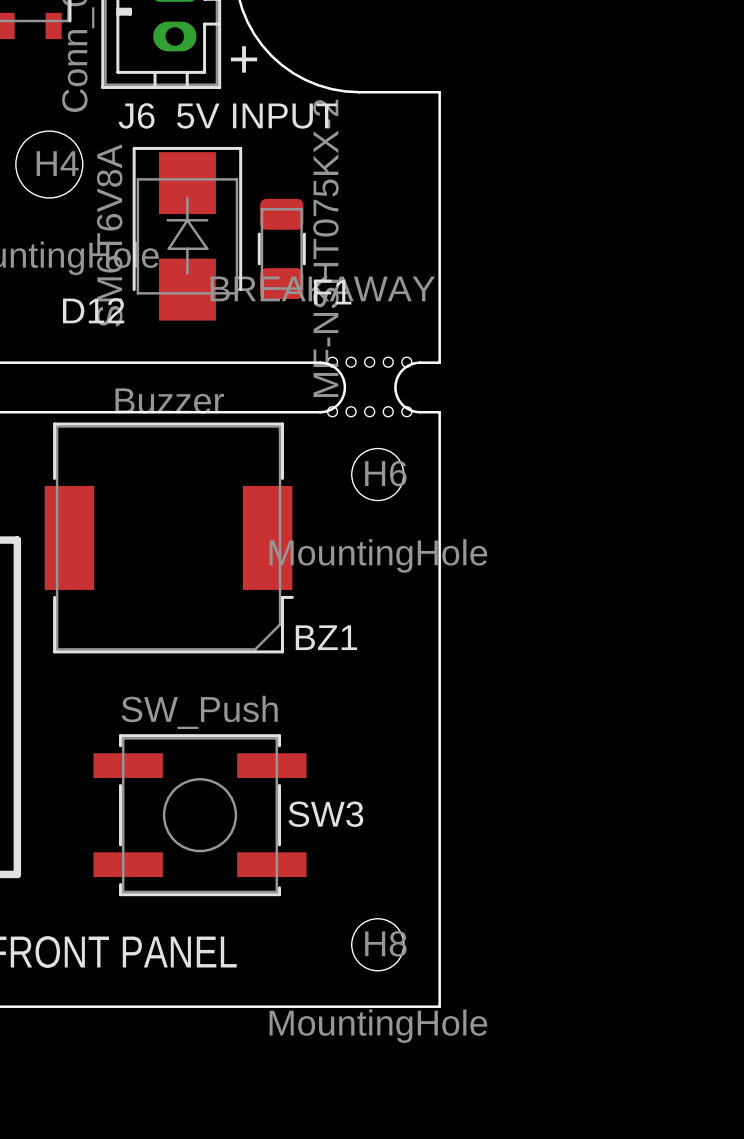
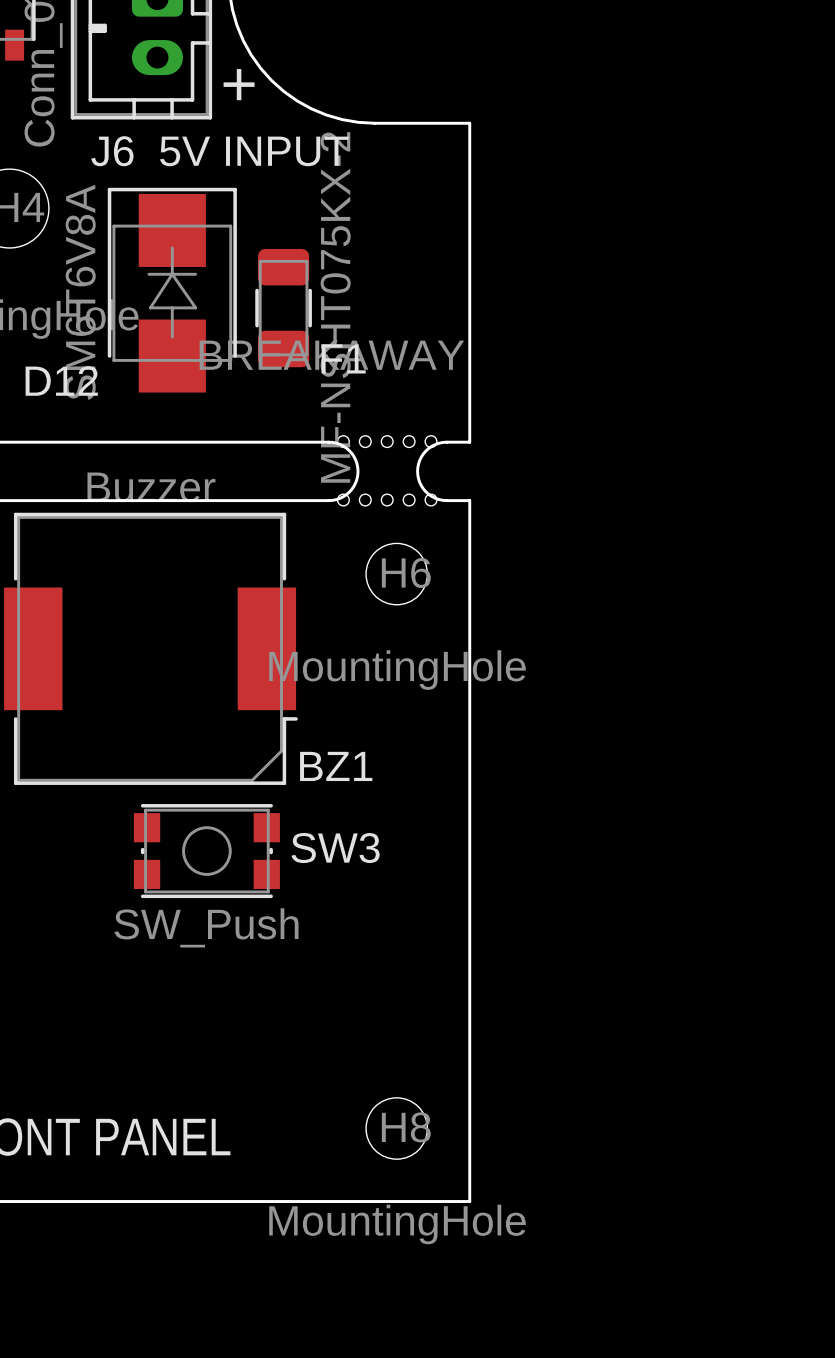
SW3 value position: SW_Push (199, 712) -> SW_Push (206, 927)
SW3 footprint: [93, 734, 307, 897] -> [133, 804, 280, 899]

